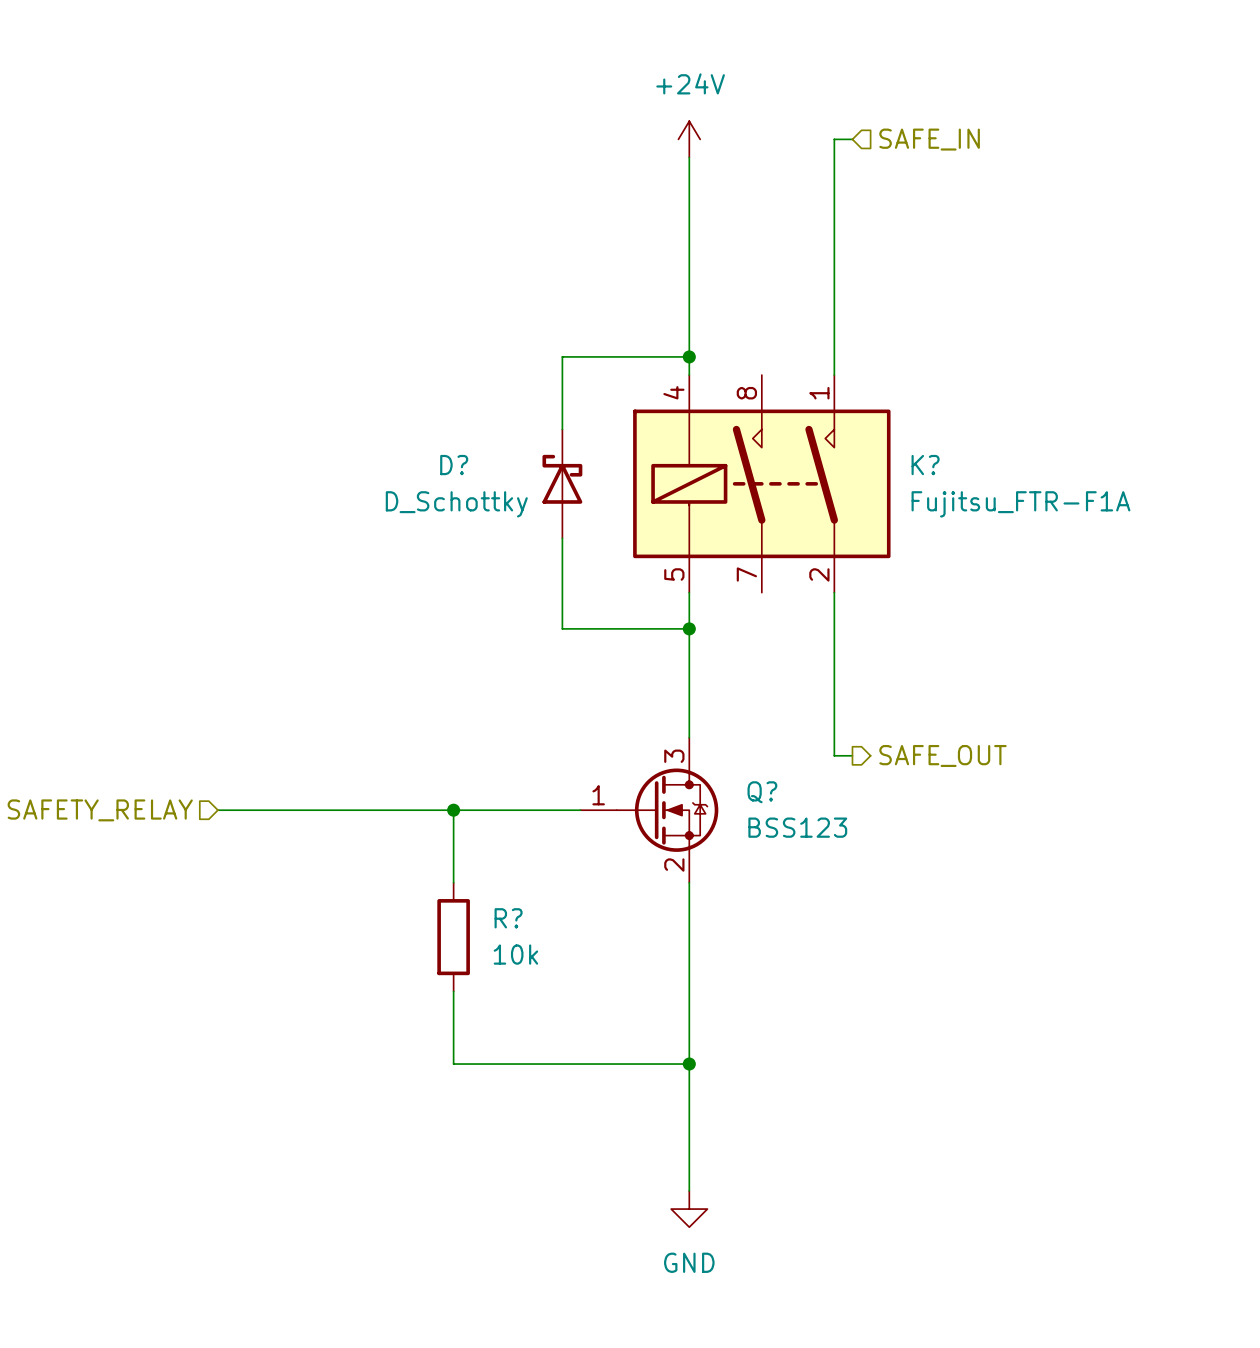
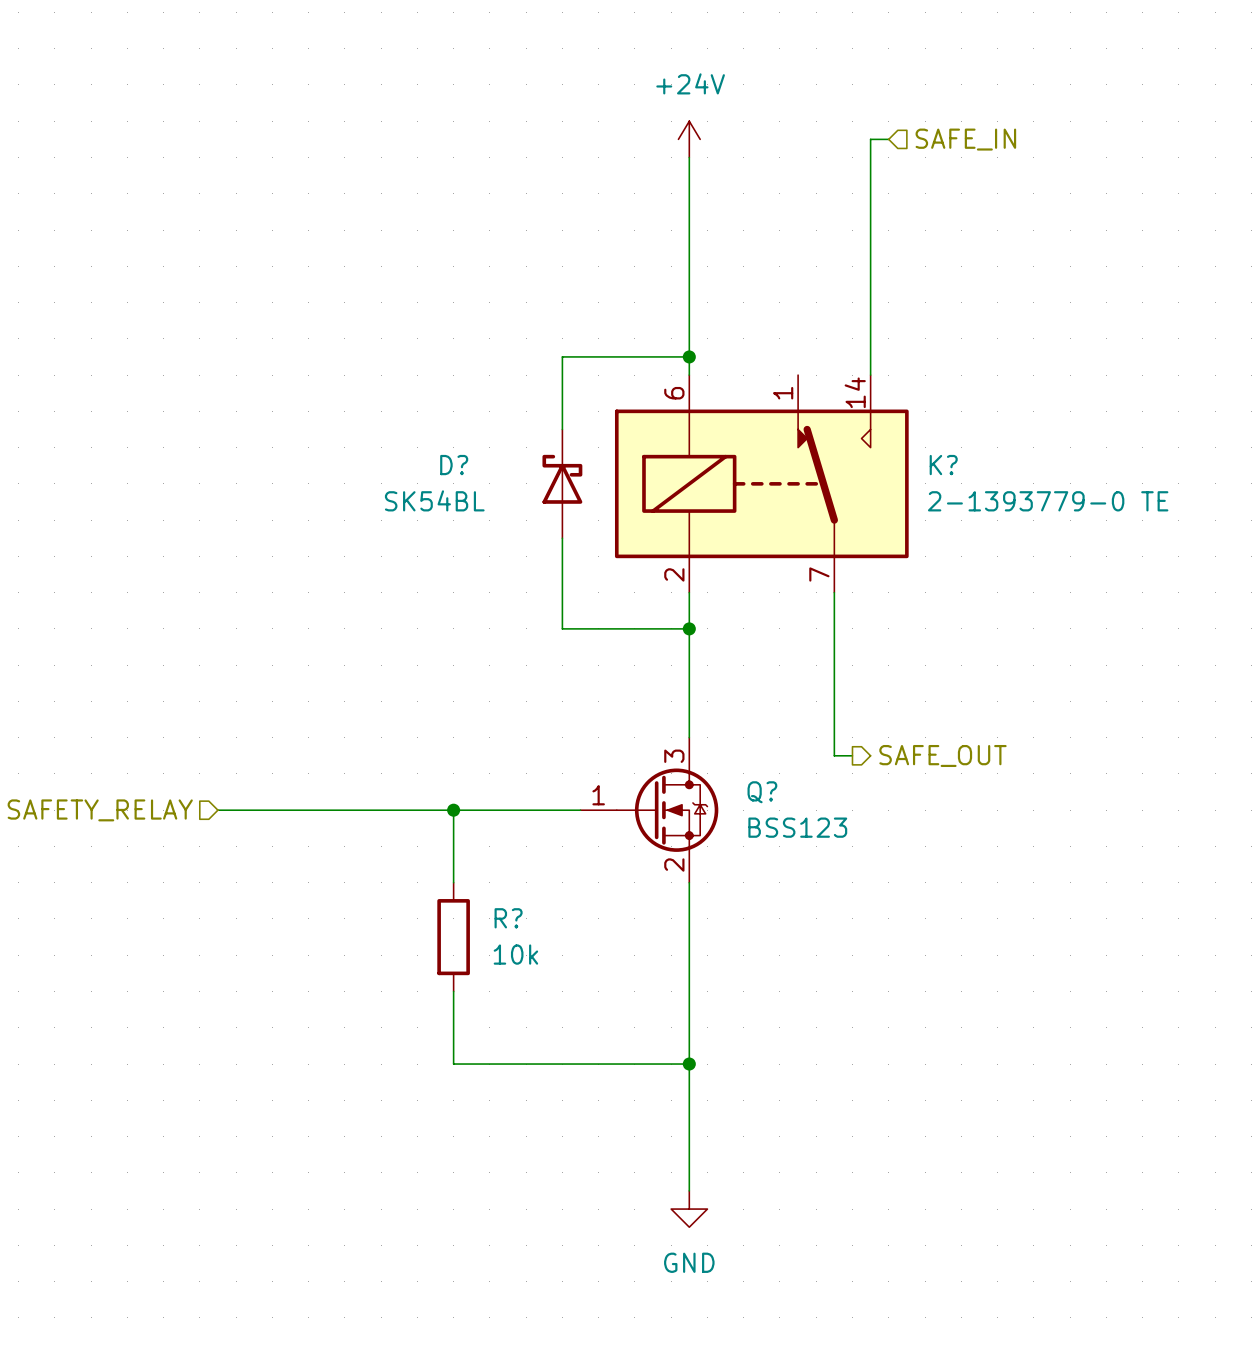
wire: (852, 139) (834, 139) (834, 375) -> (888, 139) (870, 139) (870, 375)
hierarchical label position: SAFE_IN (929, 139) -> SAFE_IN (965, 139)
K? symbol: [633, 375, 891, 593] -> [614, 375, 909, 593]
D? value: D_Schottky (456, 504) -> SK54BL (434, 500)
K? value: Fujitsu_FTR-F1A (1020, 504) -> 2-1393779-0 TE (1048, 501)

